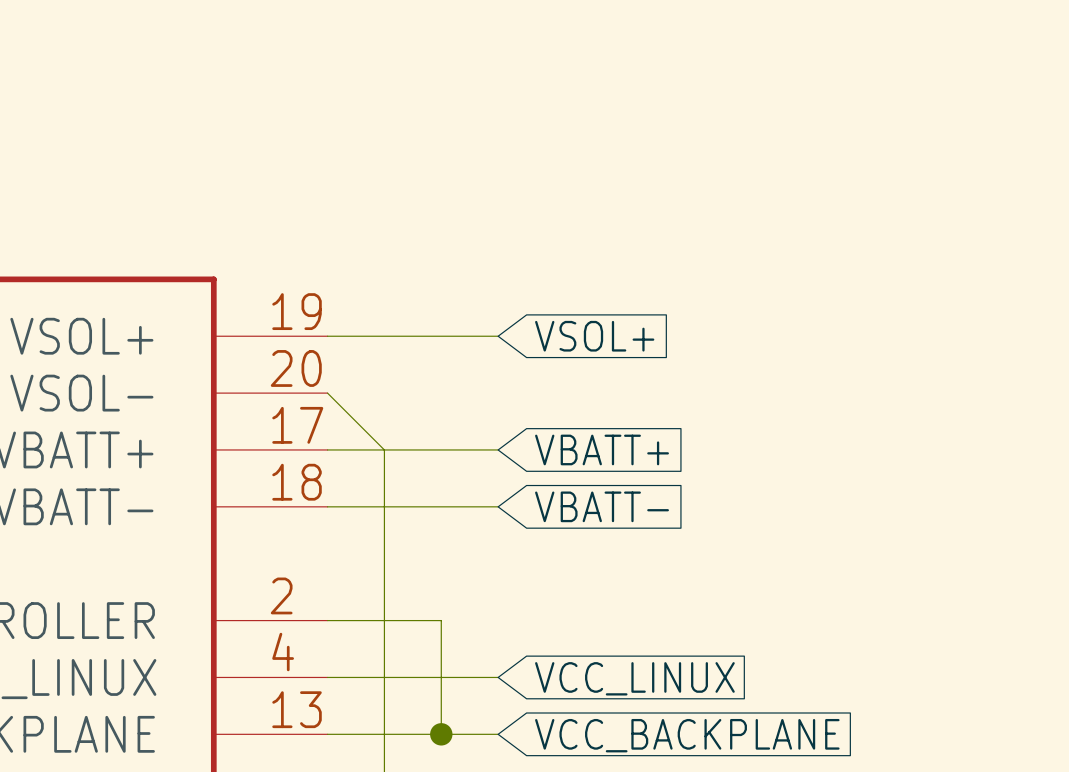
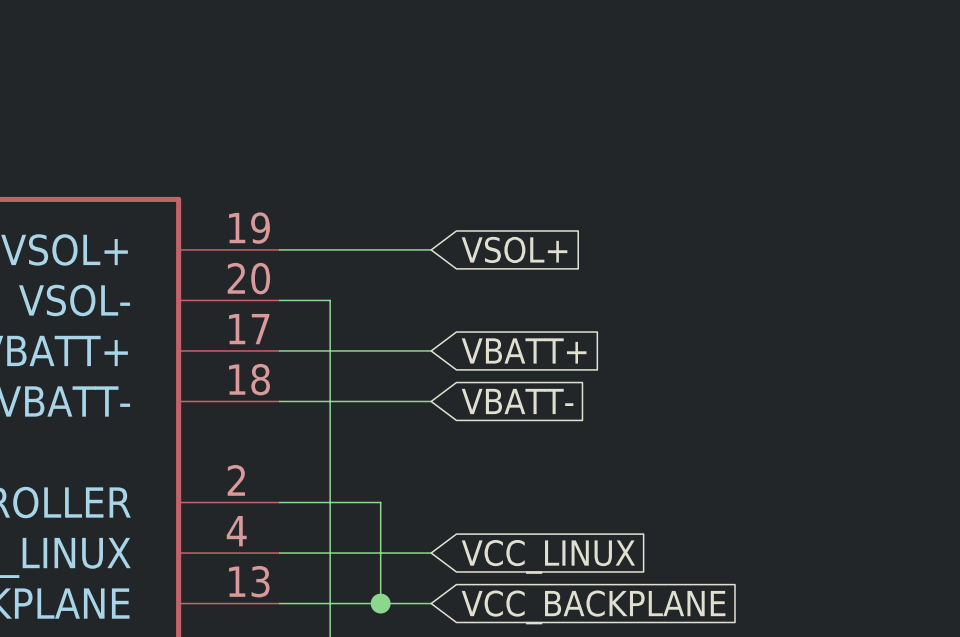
wire: (327, 393) (384, 449) -> (279, 300) (330, 300) (330, 350)

